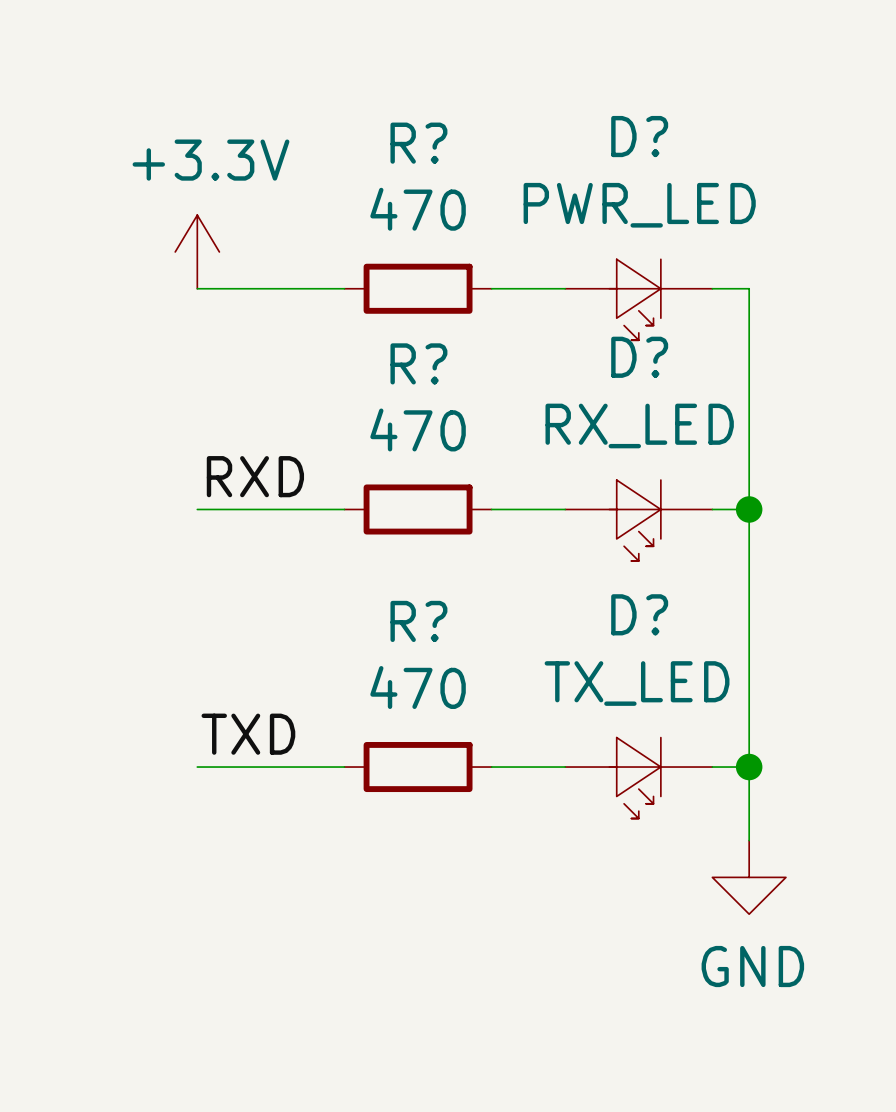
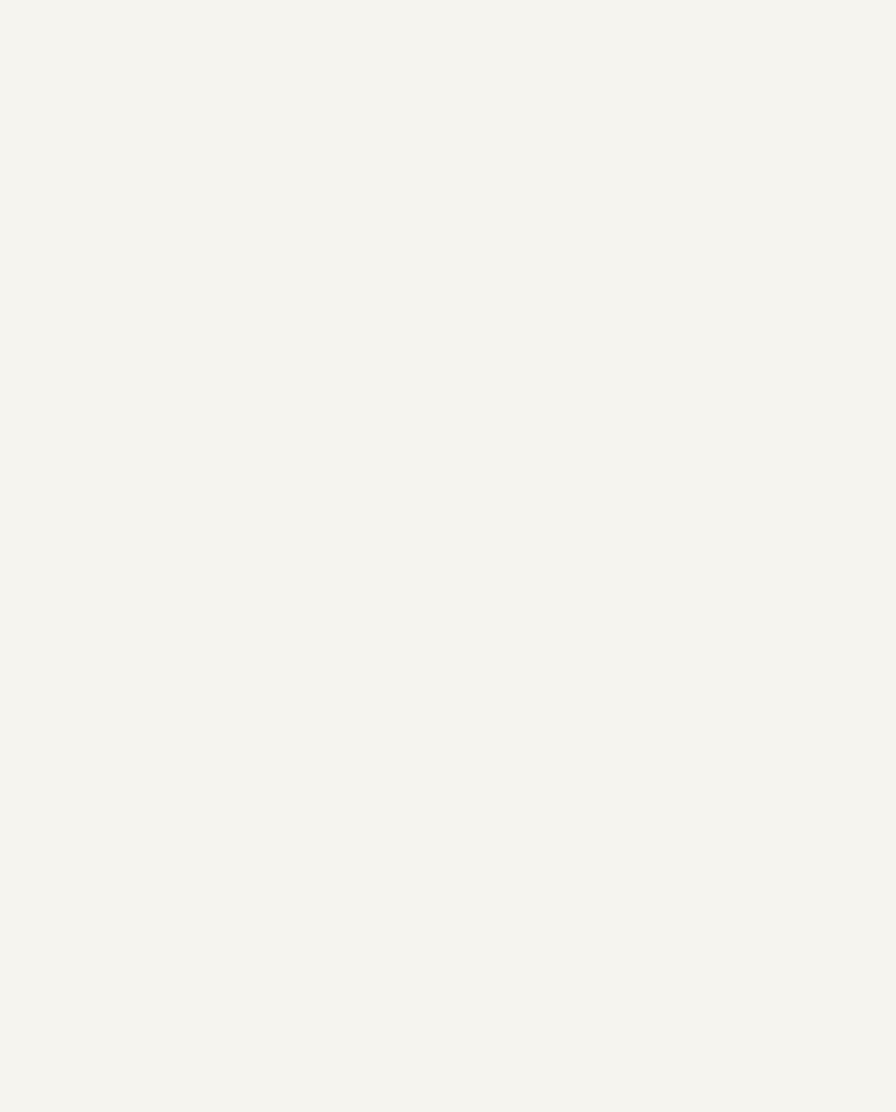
power symbol: +3.3V (197, 251) -> none
wire: (197, 288) (344, 288) -> none
R?: 470 (418, 288) -> none
wire: (491, 288) (565, 288) -> none
wire: (712, 288) (749, 288) (749, 840) -> none
D?: PWR_LED (638, 299) -> none
label: RXD (255, 476) -> none
wire: (197, 509) (344, 509) -> none
R?: 470 (418, 509) -> none
wire: (491, 509) (565, 509) -> none
wire: (712, 509) (749, 509) -> none
junction: (749, 509) -> none
D?: RX_LED (638, 520) -> none
label: TXD (248, 734) -> none
wire: (197, 767) (344, 767) -> none
R?: 470 (418, 767) -> none
wire: (491, 767) (565, 767) -> none
wire: (712, 767) (749, 767) -> none
junction: (749, 767) -> none
D?: TX_LED (638, 778) -> none
power symbol: GND (749, 877) -> none

